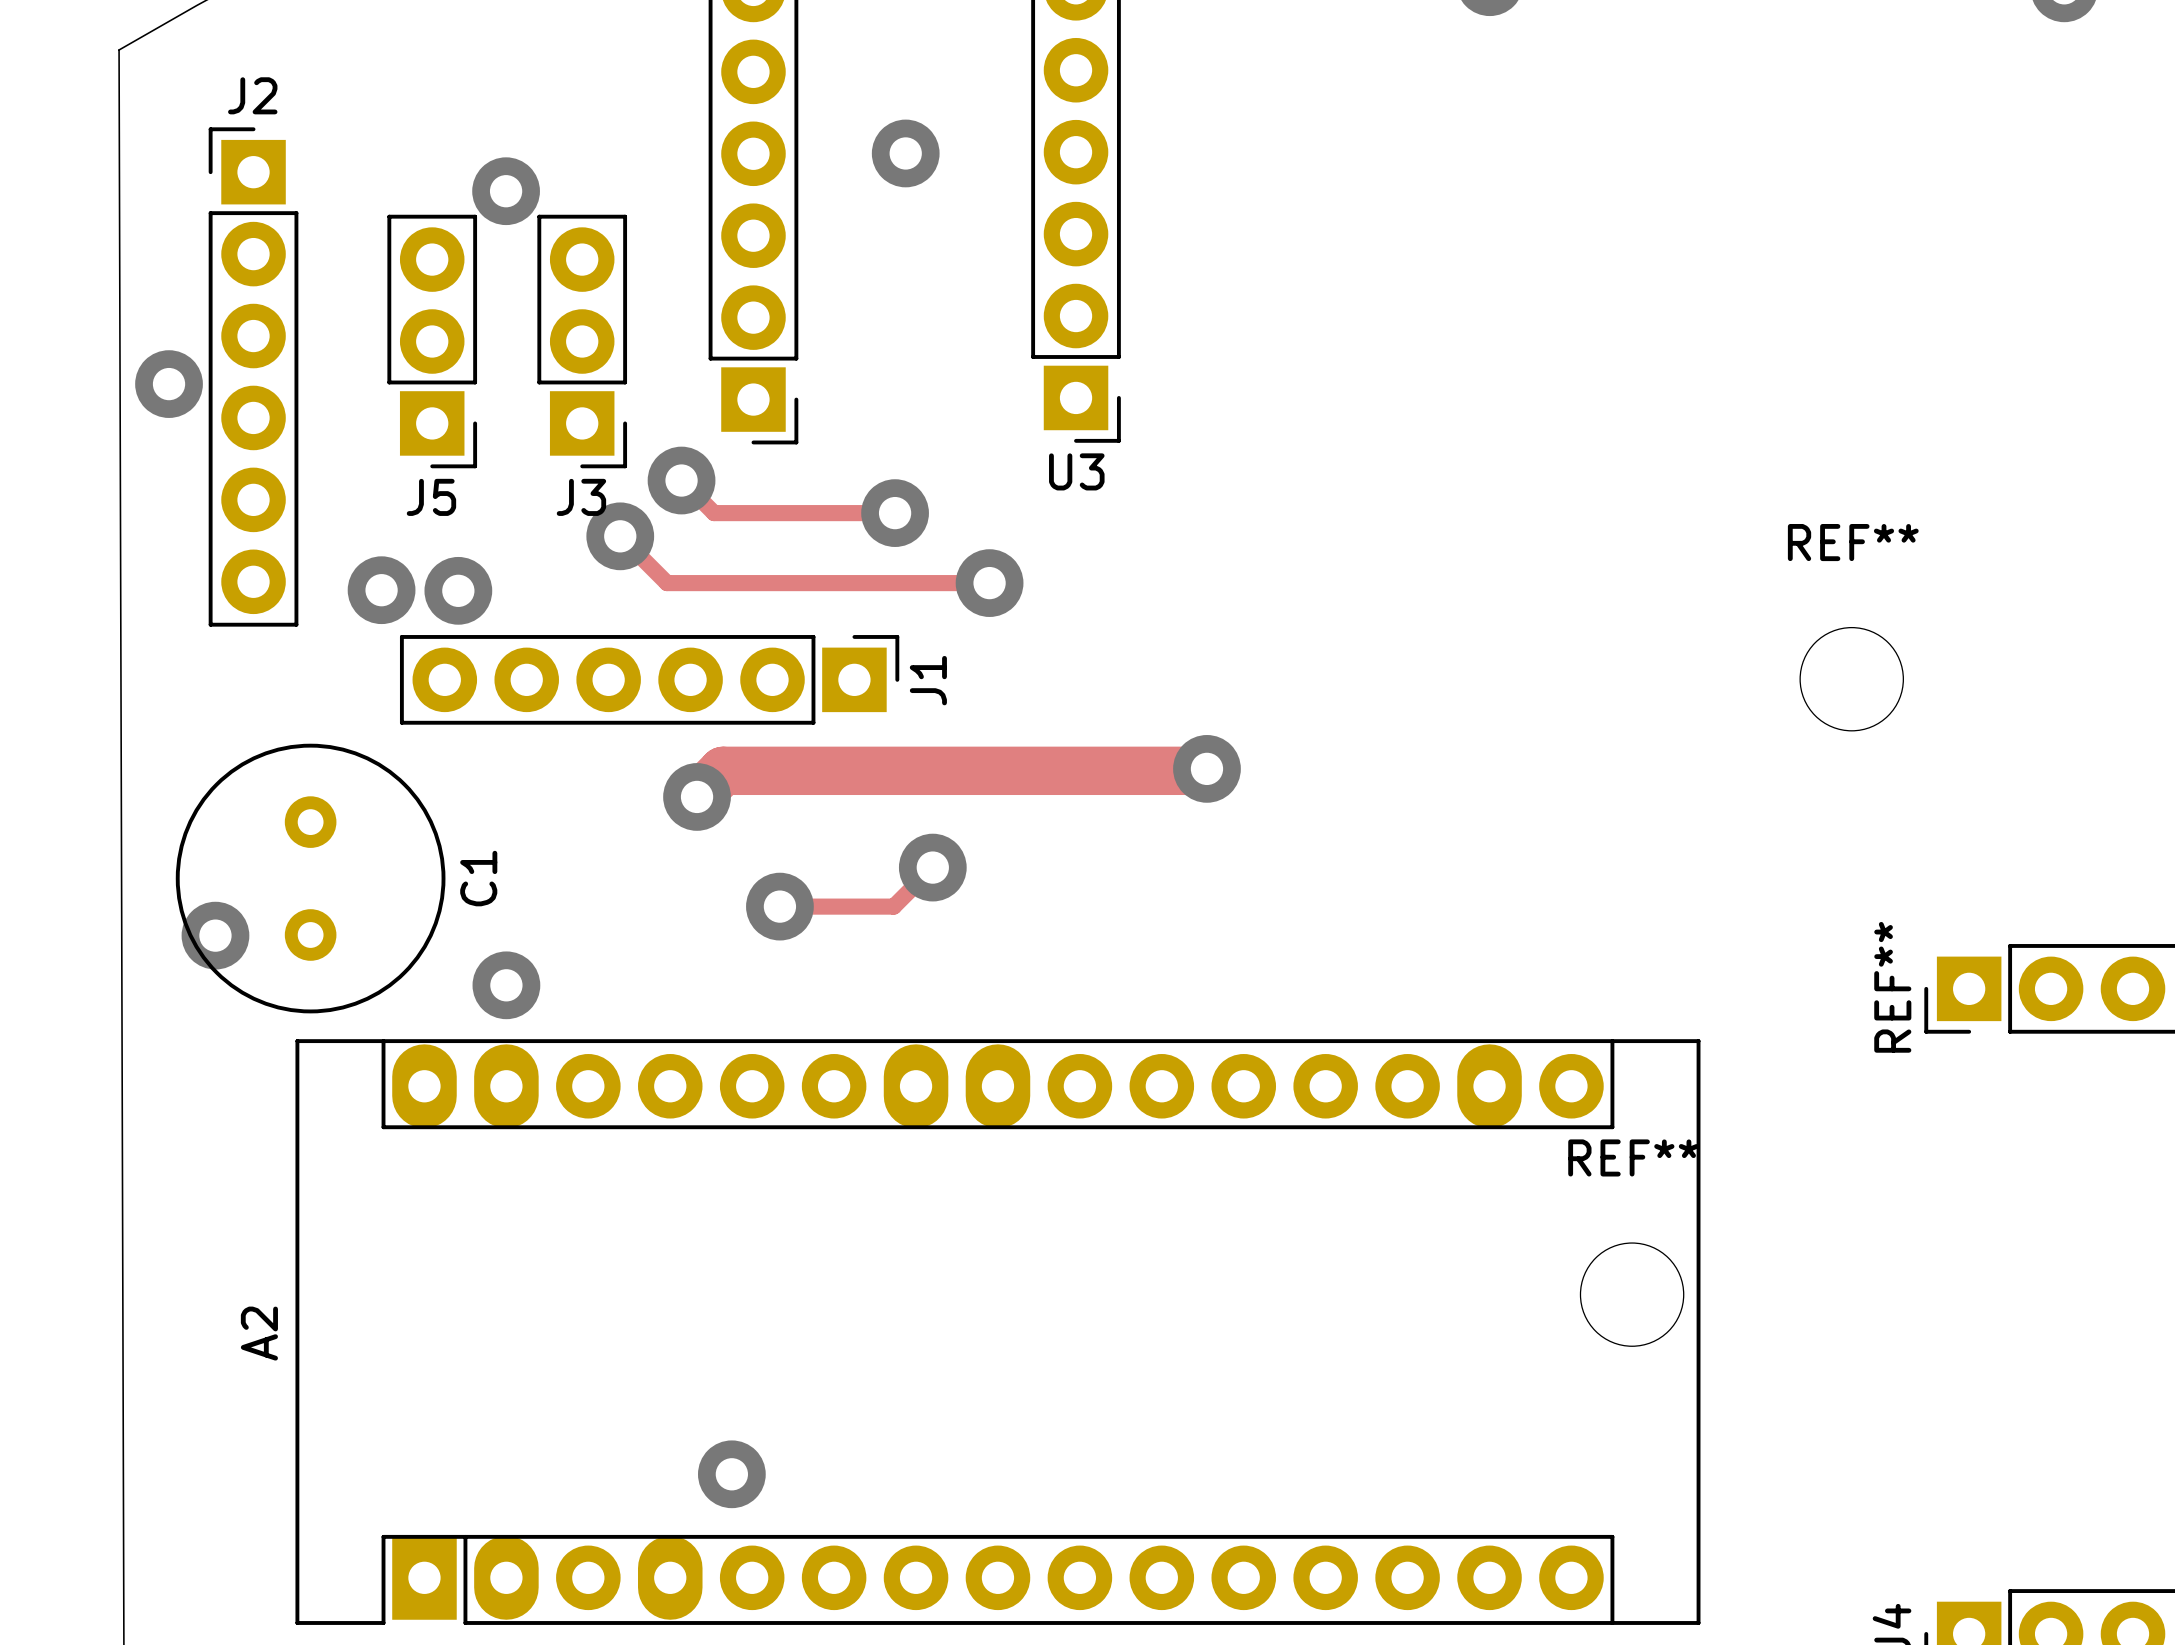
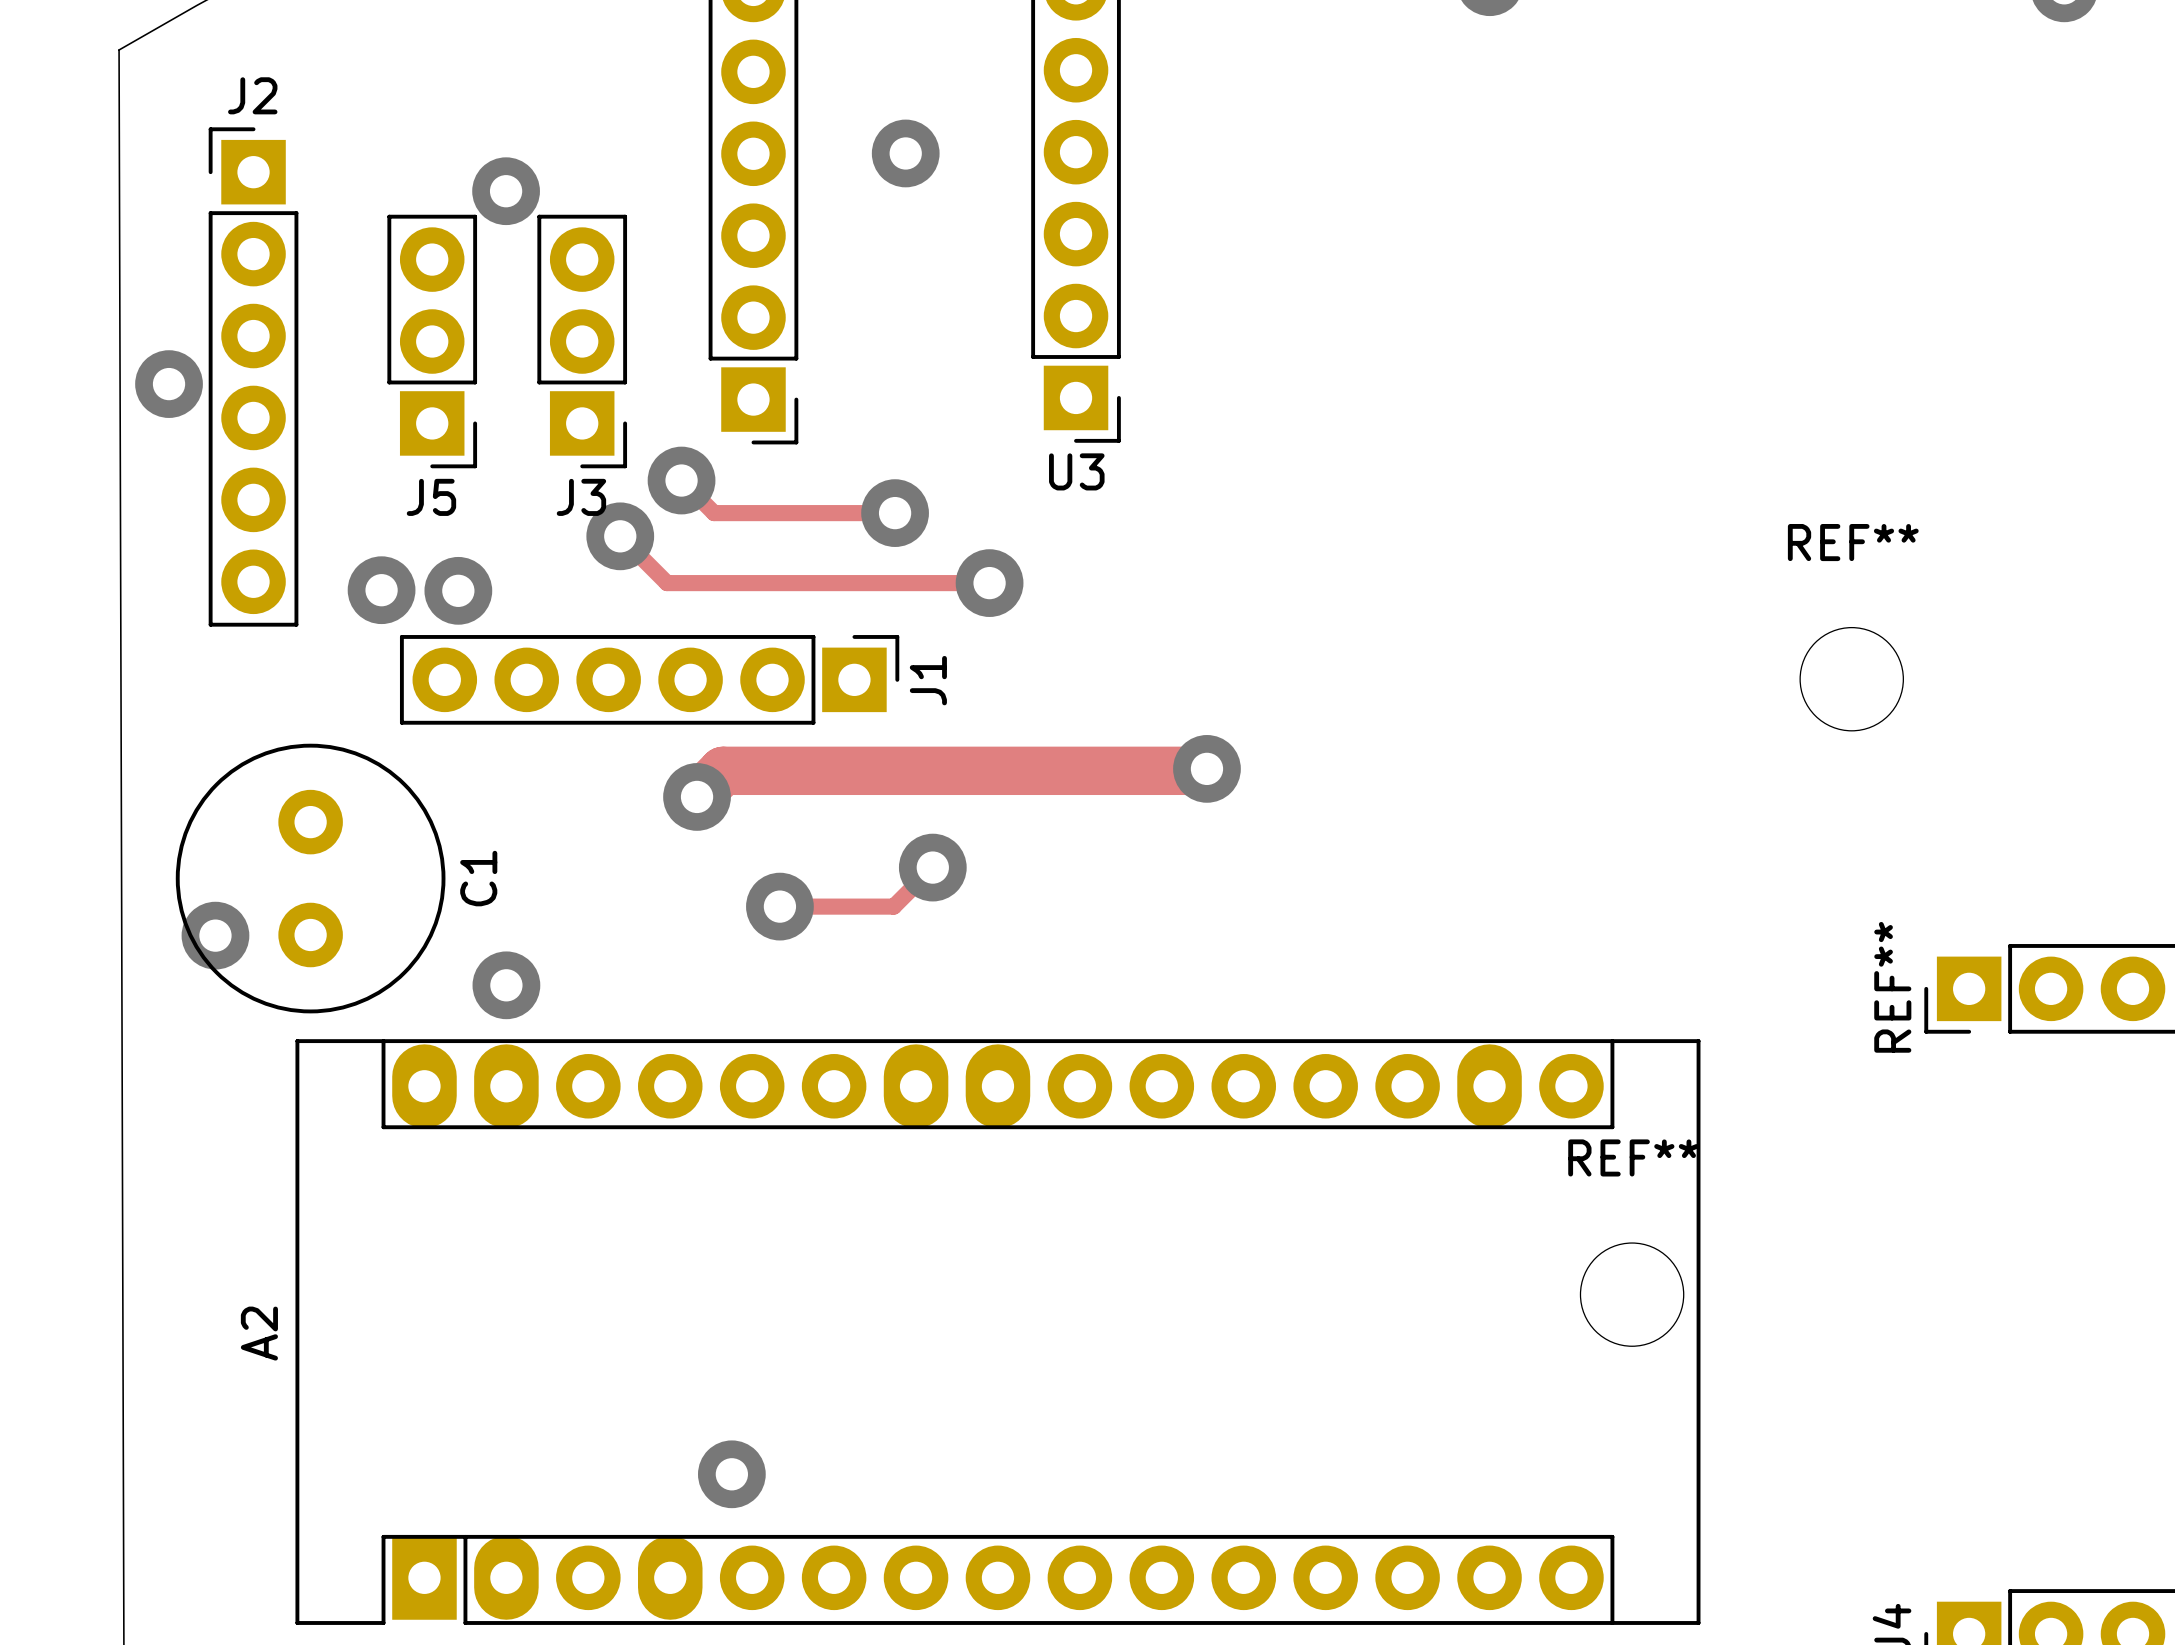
C1 footprint: [175, 743, 446, 1014] -> [175, 743, 446, 1014]

